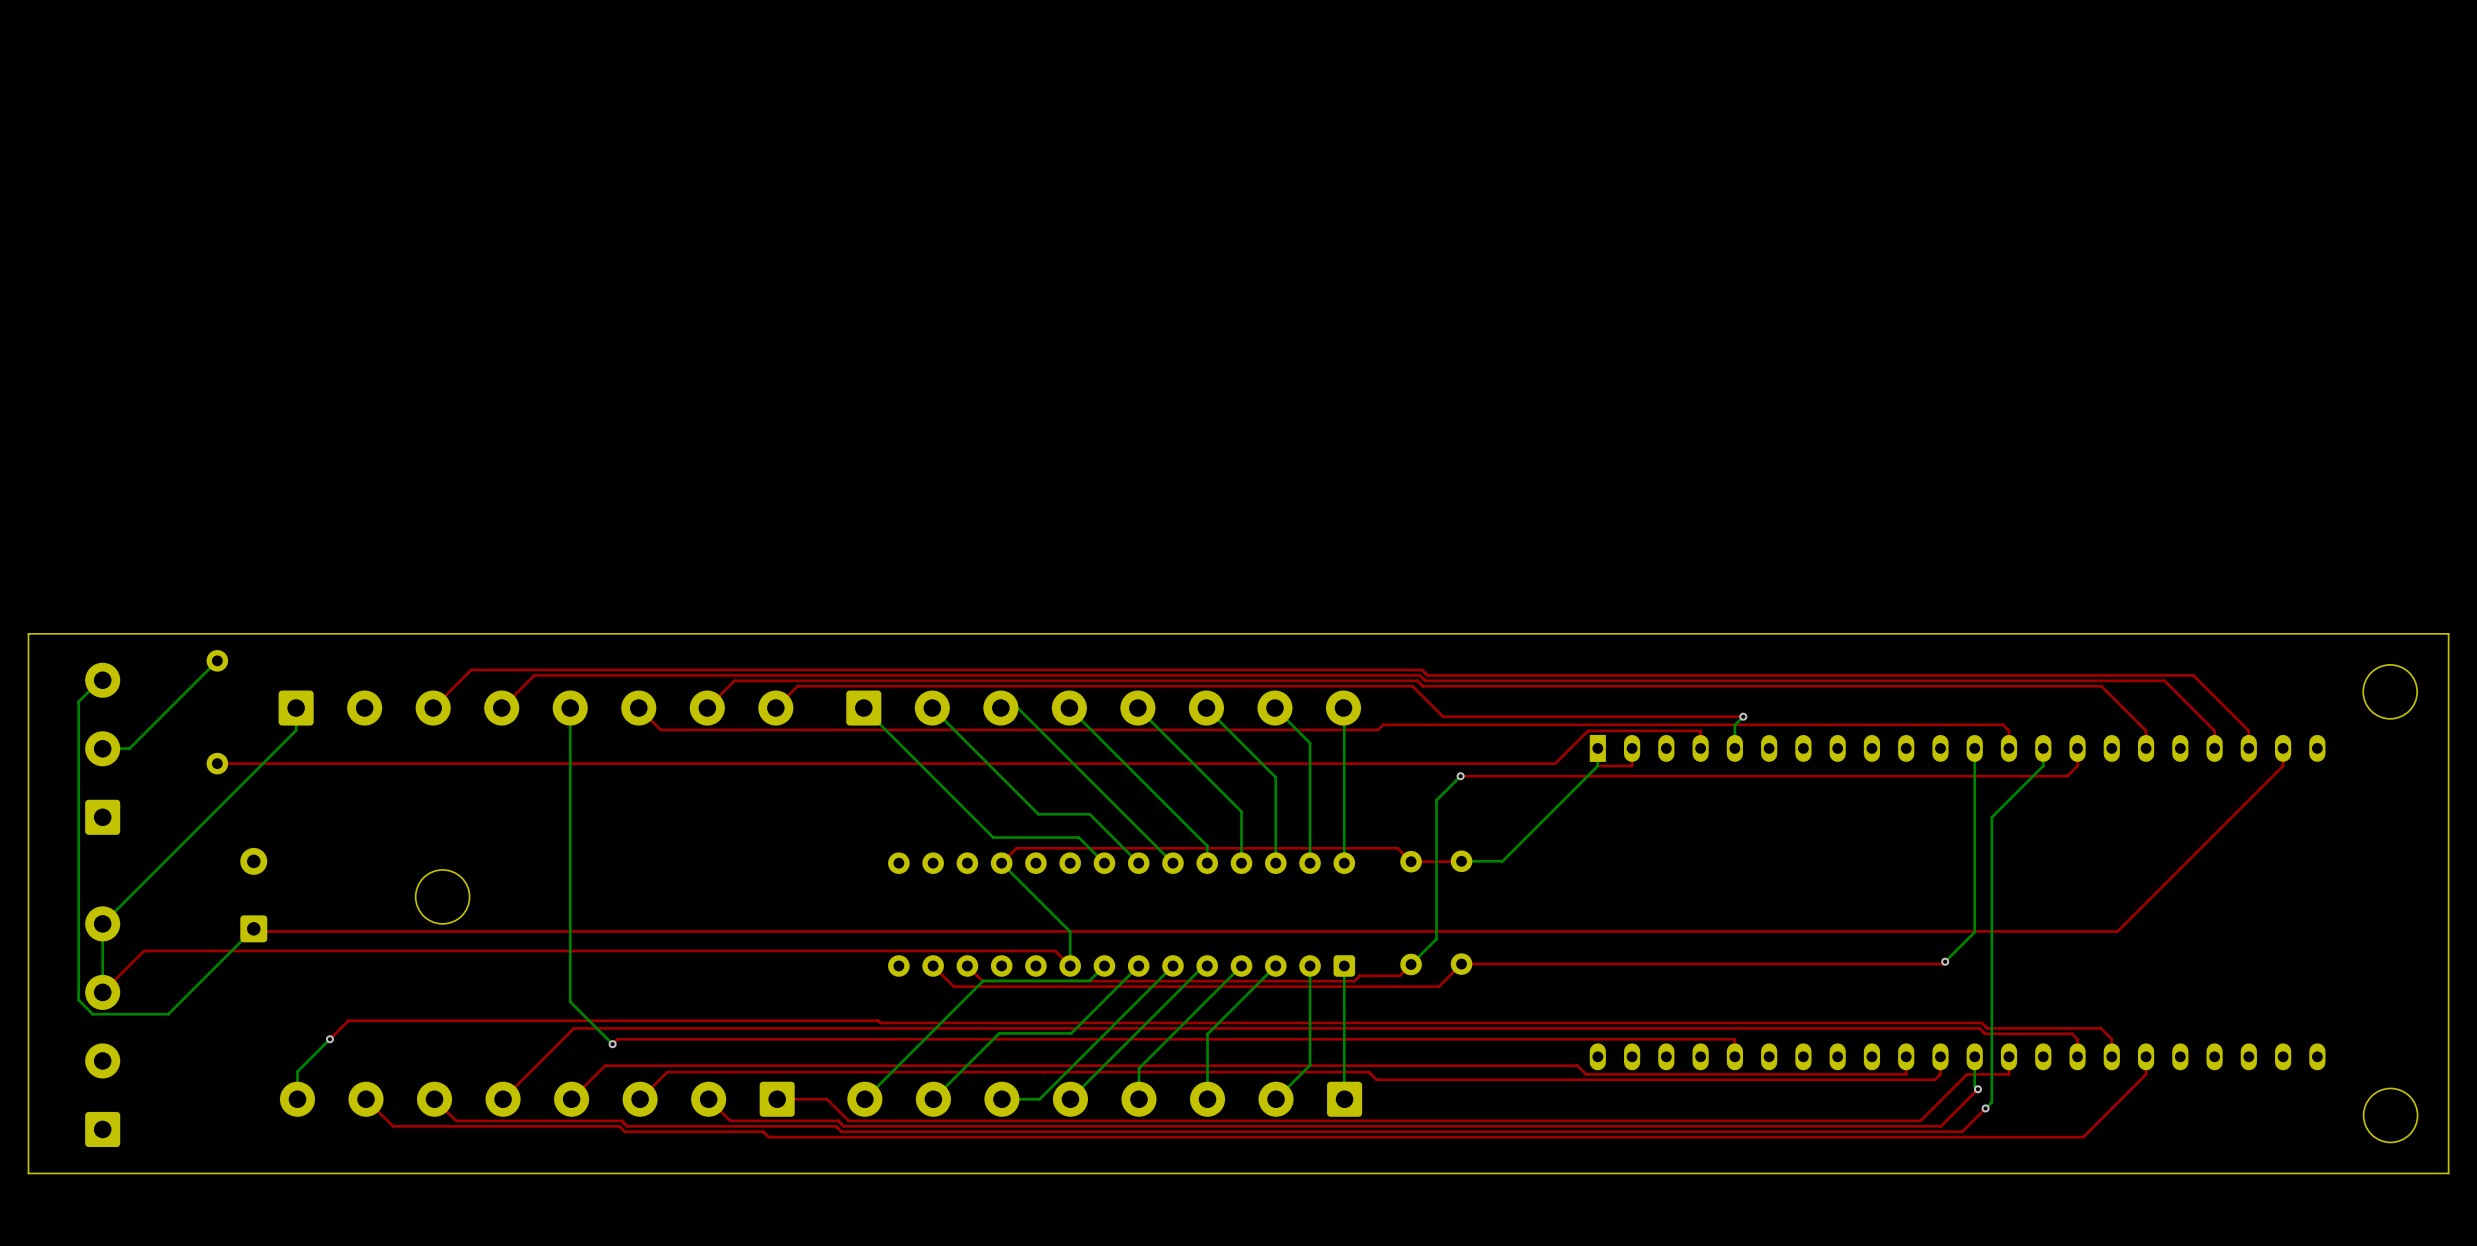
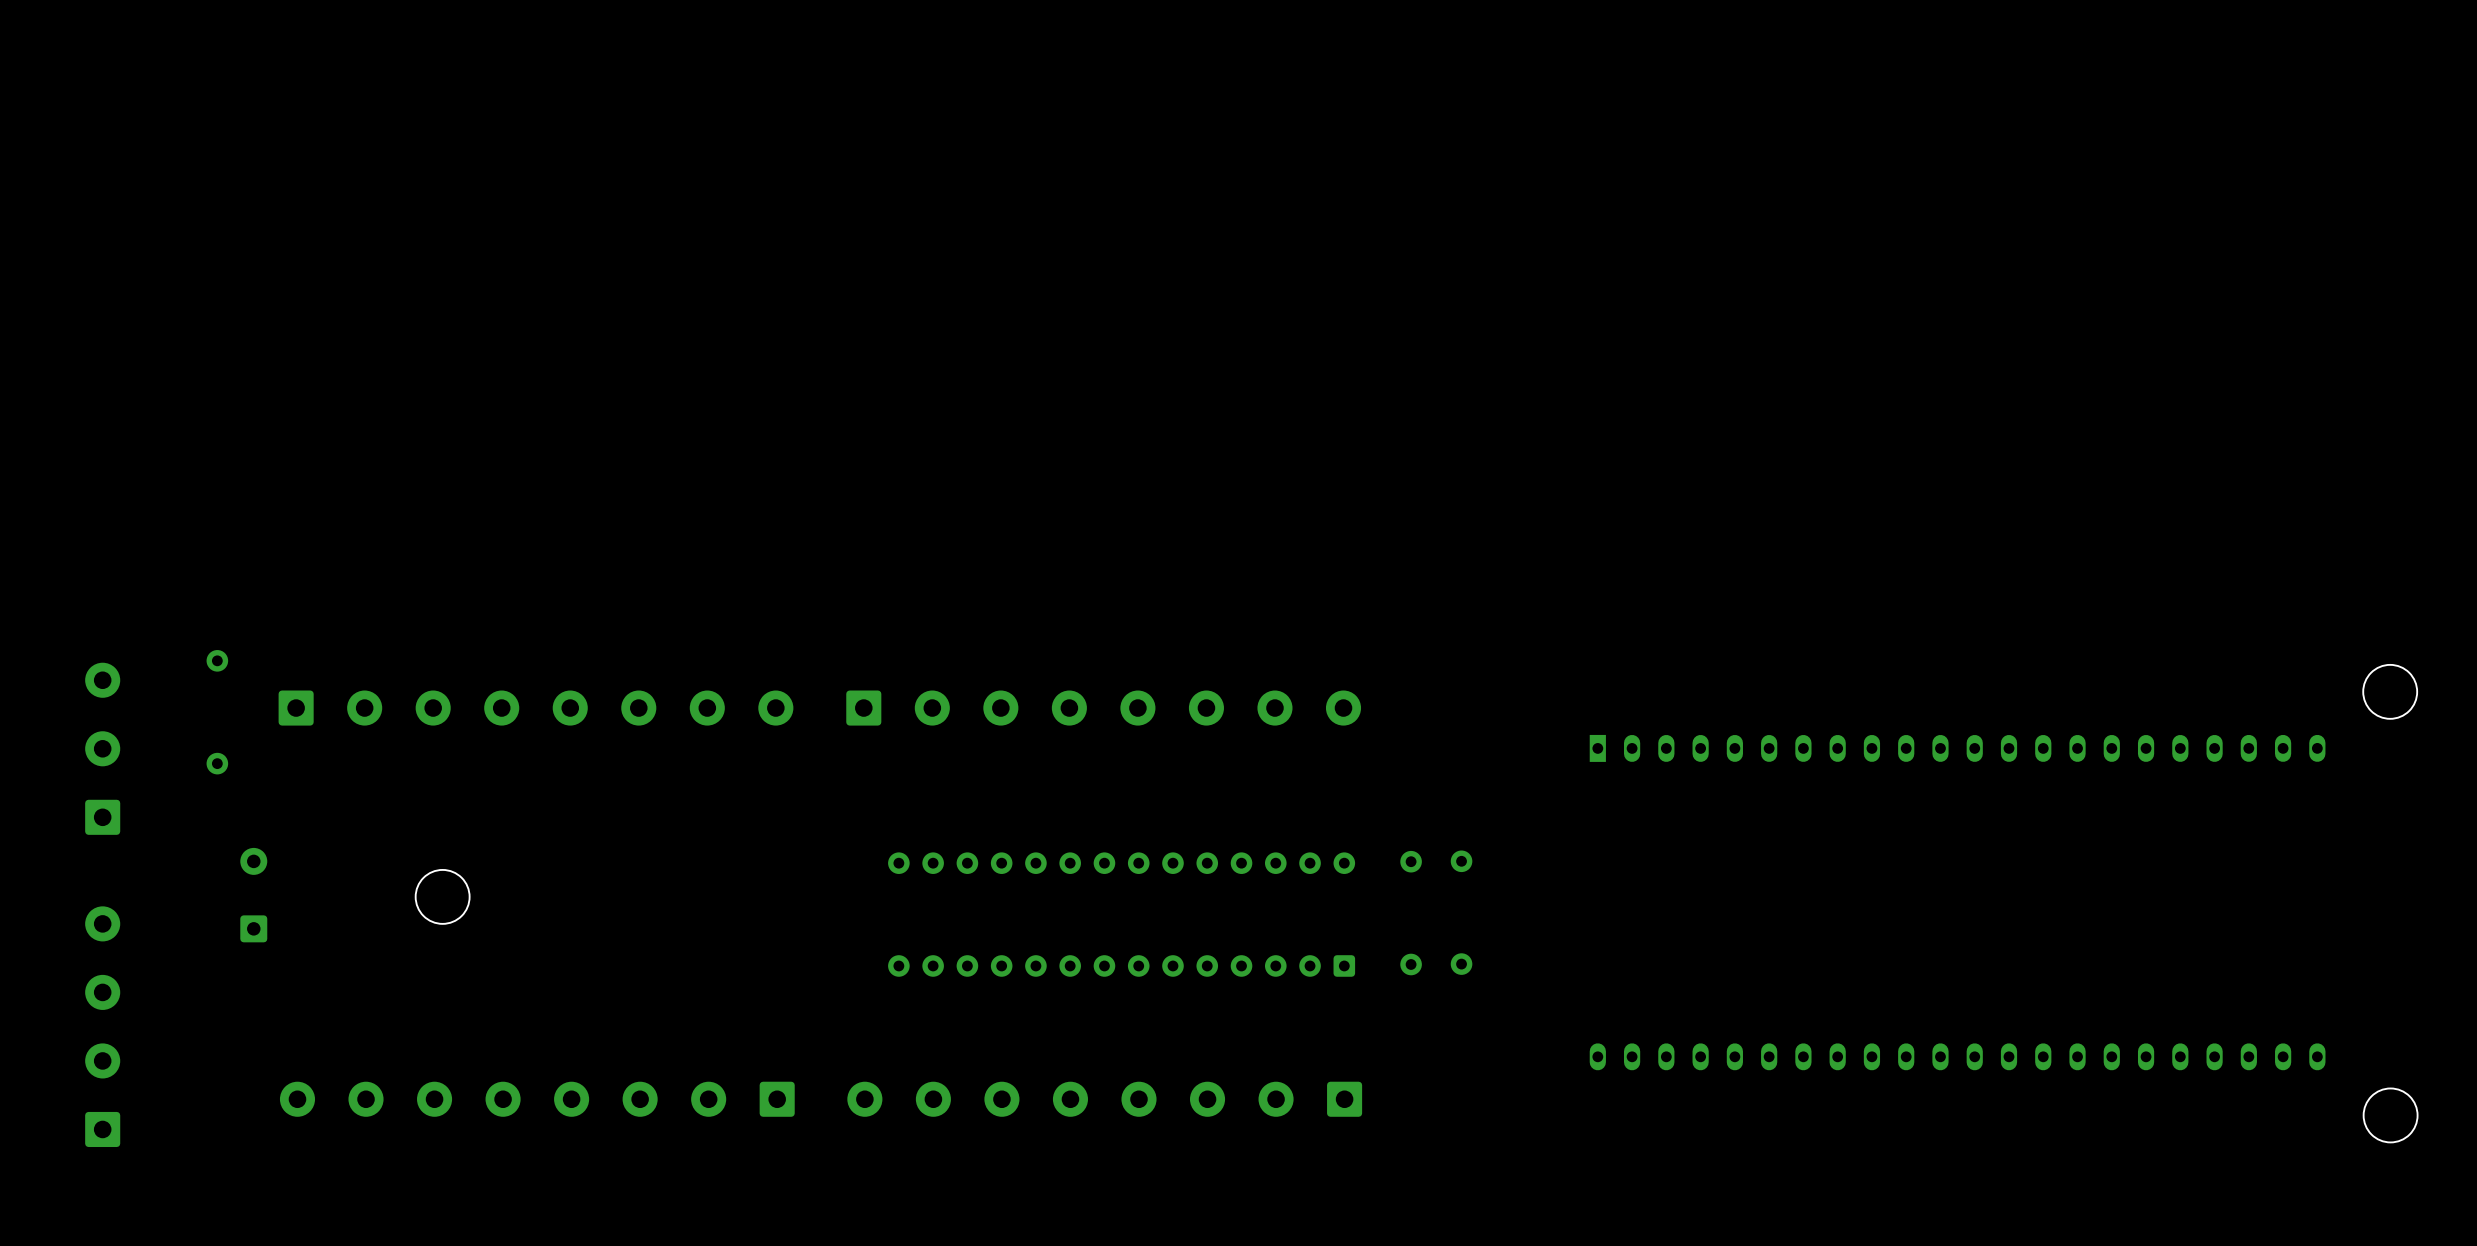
board edge: (2448, 633) (28, 633) (28, 1173) (2448, 1173) (2448, 633) -> none
bottom track: (217, 660) (129, 748) (100, 748) -> none
bottom track: (100, 680) (78, 701) (78, 1000) (92, 1014) (168, 1014) (253, 928) -> none
bottom track: (296, 708) (296, 730) (102, 923) (102, 992) -> none
top track: (433, 708) (471, 669) (1422, 669) (1427, 675) (2193, 675) (2248, 730) (2248, 748) -> none
top track: (501, 708) (534, 675) (1419, 675) (1425, 680) (2164, 680) (2214, 730) (2214, 748) -> none
bottom track: (570, 708) (570, 1001) (612, 1044) -> none
top track: (638, 708) (660, 729) (1378, 729) (1383, 724) (2002, 724) (2009, 730) (2009, 748) -> none
top track: (707, 708) (734, 680) (1417, 680) (1422, 686) (2101, 686) (2146, 730) (2146, 748) -> none
top track: (775, 708) (797, 686) (1412, 686) (1443, 716) (1743, 716) -> none
bottom track: (863, 708) (993, 837) (1078, 837) (1104, 863) -> none
bottom track: (932, 708) (1038, 814) (1089, 814) (1138, 863) -> none
bottom track: (1000, 708) (1017, 708) (1172, 863) -> none
bottom track: (1069, 708) (1207, 845) (1207, 863) -> none
bottom track: (1137, 708) (1241, 811) (1241, 863) -> none
bottom track: (1206, 708) (1275, 777) (1275, 863) -> none
bottom track: (1274, 708) (1310, 743) (1310, 863) -> none
bottom track: (1343, 708) (1344, 863) -> none
bottom track: (1743, 716) (1734, 725) (1734, 748) -> none
via: (1743, 716) -> none
bottom track: (1597, 748) (1597, 765) (1502, 861) (1461, 861) -> none
top track: (1632, 748) (1632, 765) (1597, 765) (1597, 748) -> none
top track: (1700, 748) (1700, 730) (1588, 730) (1555, 763) (217, 763) -> none
bottom track: (1974, 748) (1974, 932) (1945, 961) -> none
bottom track: (2043, 748) (2043, 765) (1991, 817) (1991, 1102) (1985, 1108) -> none
top track: (2077, 748) (2077, 765) (2067, 776) (1460, 776) -> none
top track: (2283, 748) (2283, 765) (2117, 931) (256, 931) (253, 928) -> none
bottom track: (1460, 776) (1436, 800) (1436, 939) (1411, 964) -> none
via: (1460, 776) -> none
top track: (1461, 861) (1411, 861) (1397, 848) (1016, 848) (1001, 863) -> none
bottom track: (1001, 863) (1070, 931) (1070, 965) -> none
top track: (1945, 961) (1942, 964) (1461, 964) (1439, 986) (953, 986) (933, 965) -> none
via: (1945, 961) -> none
top track: (1411, 964) (1399, 975) (1359, 975) (1354, 981) (982, 981) (967, 965) -> none
top track: (1070, 965) (1055, 951) (144, 951) (102, 992) -> none
bottom track: (1104, 965) (1089, 980) (983, 980) (864, 1099) -> none
bottom track: (1138, 965) (1071, 1033) (999, 1033) (933, 1099) -> none
bottom track: (1172, 965) (1039, 1099) (1001, 1099) -> none
bottom track: (1207, 965) (1203, 965) (1070, 1099) -> none
bottom track: (1241, 965) (1138, 1068) (1138, 1099) -> none
bottom track: (1275, 965) (1207, 1034) (1207, 1099) -> none
bottom track: (1310, 965) (1310, 1065) (1276, 1099) -> none
bottom track: (1344, 965) (1344, 1099) -> none
top track: (329, 1039) (348, 1020) (878, 1020) (880, 1022) (1981, 1022) (1987, 1028) (2100, 1028) (2111, 1039) (2111, 1056) -> none
bottom track: (329, 1039) (297, 1071) (297, 1099) -> none
via: (329, 1039) -> none
top track: (612, 1044) (617, 1039) (1734, 1039) (1734, 1056) -> none
via: (612, 1044) -> none
top track: (1906, 1056) (1906, 1074) (1586, 1074) (1577, 1065) (605, 1065) (571, 1099) -> none
top track: (1940, 1056) (1940, 1074) (1935, 1079) (1376, 1079) (1368, 1072) (667, 1072) (640, 1099) -> none
bottom track: (1974, 1056) (1974, 1086) (1977, 1089) -> none
top track: (2009, 1056) (2009, 1074) (1967, 1074) (1920, 1120) (848, 1120) (827, 1099) (777, 1099) -> none
top track: (2077, 1056) (2077, 1039) (2072, 1033) (1985, 1033) (1979, 1028) (573, 1028) (503, 1099) -> none
top track: (2146, 1056) (2146, 1074) (2083, 1137) (768, 1137) (763, 1131) (625, 1131) (619, 1126) (393, 1126) (366, 1099) -> none
top track: (1977, 1089) (1940, 1126) (843, 1126) (838, 1120) (730, 1120) (708, 1099) -> none
via: (1977, 1089) -> none
top track: (434, 1099) (456, 1120) (621, 1120) (627, 1126) (836, 1126) (841, 1131) (1962, 1131) (1985, 1108) -> none
via: (1985, 1108) -> none

